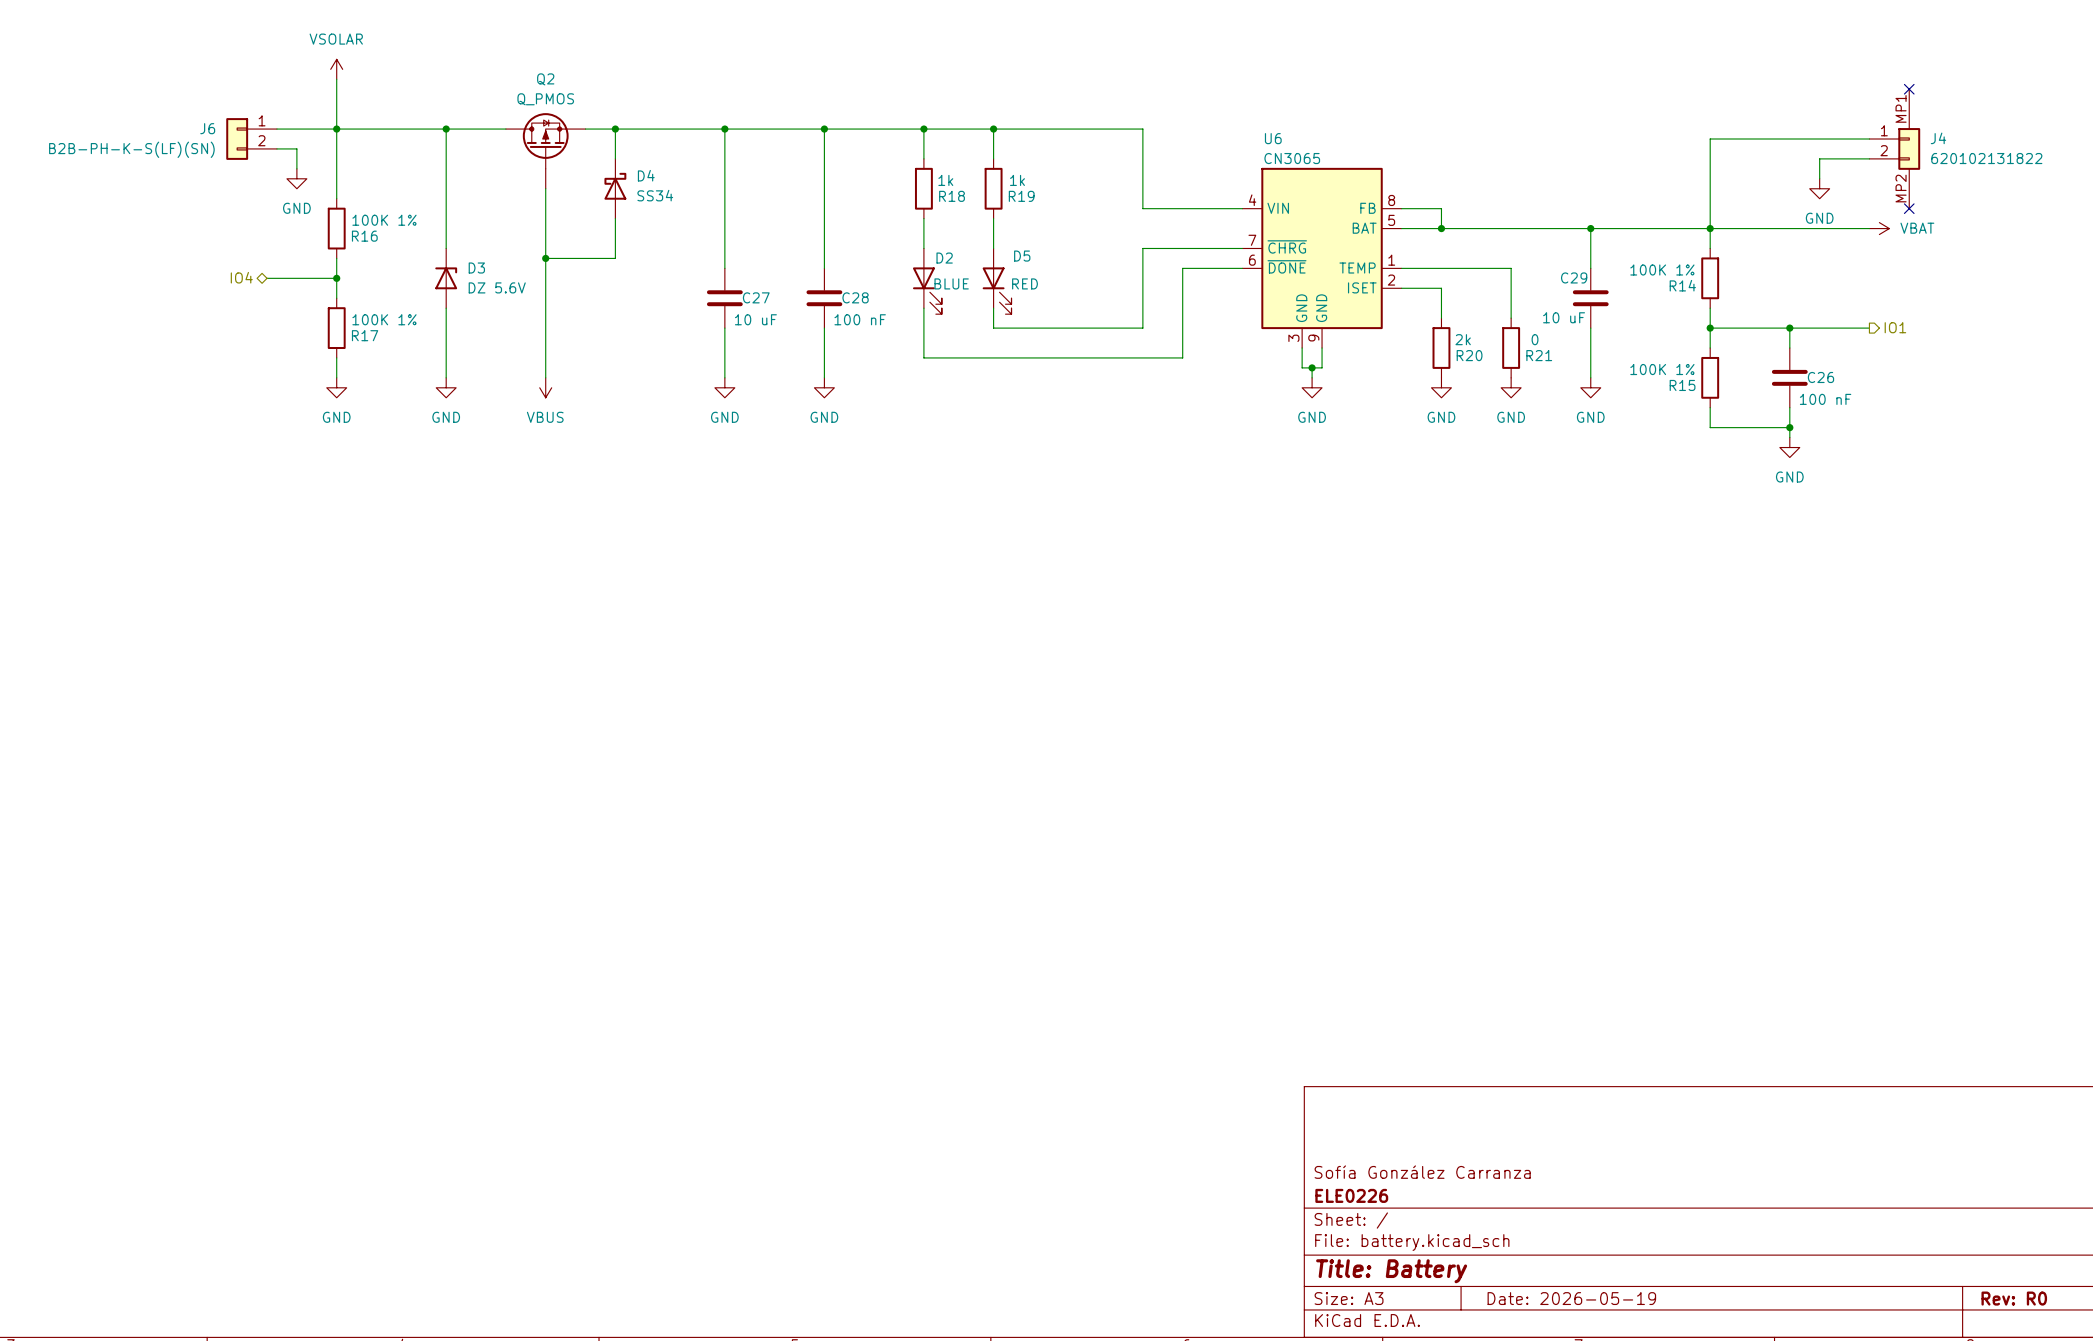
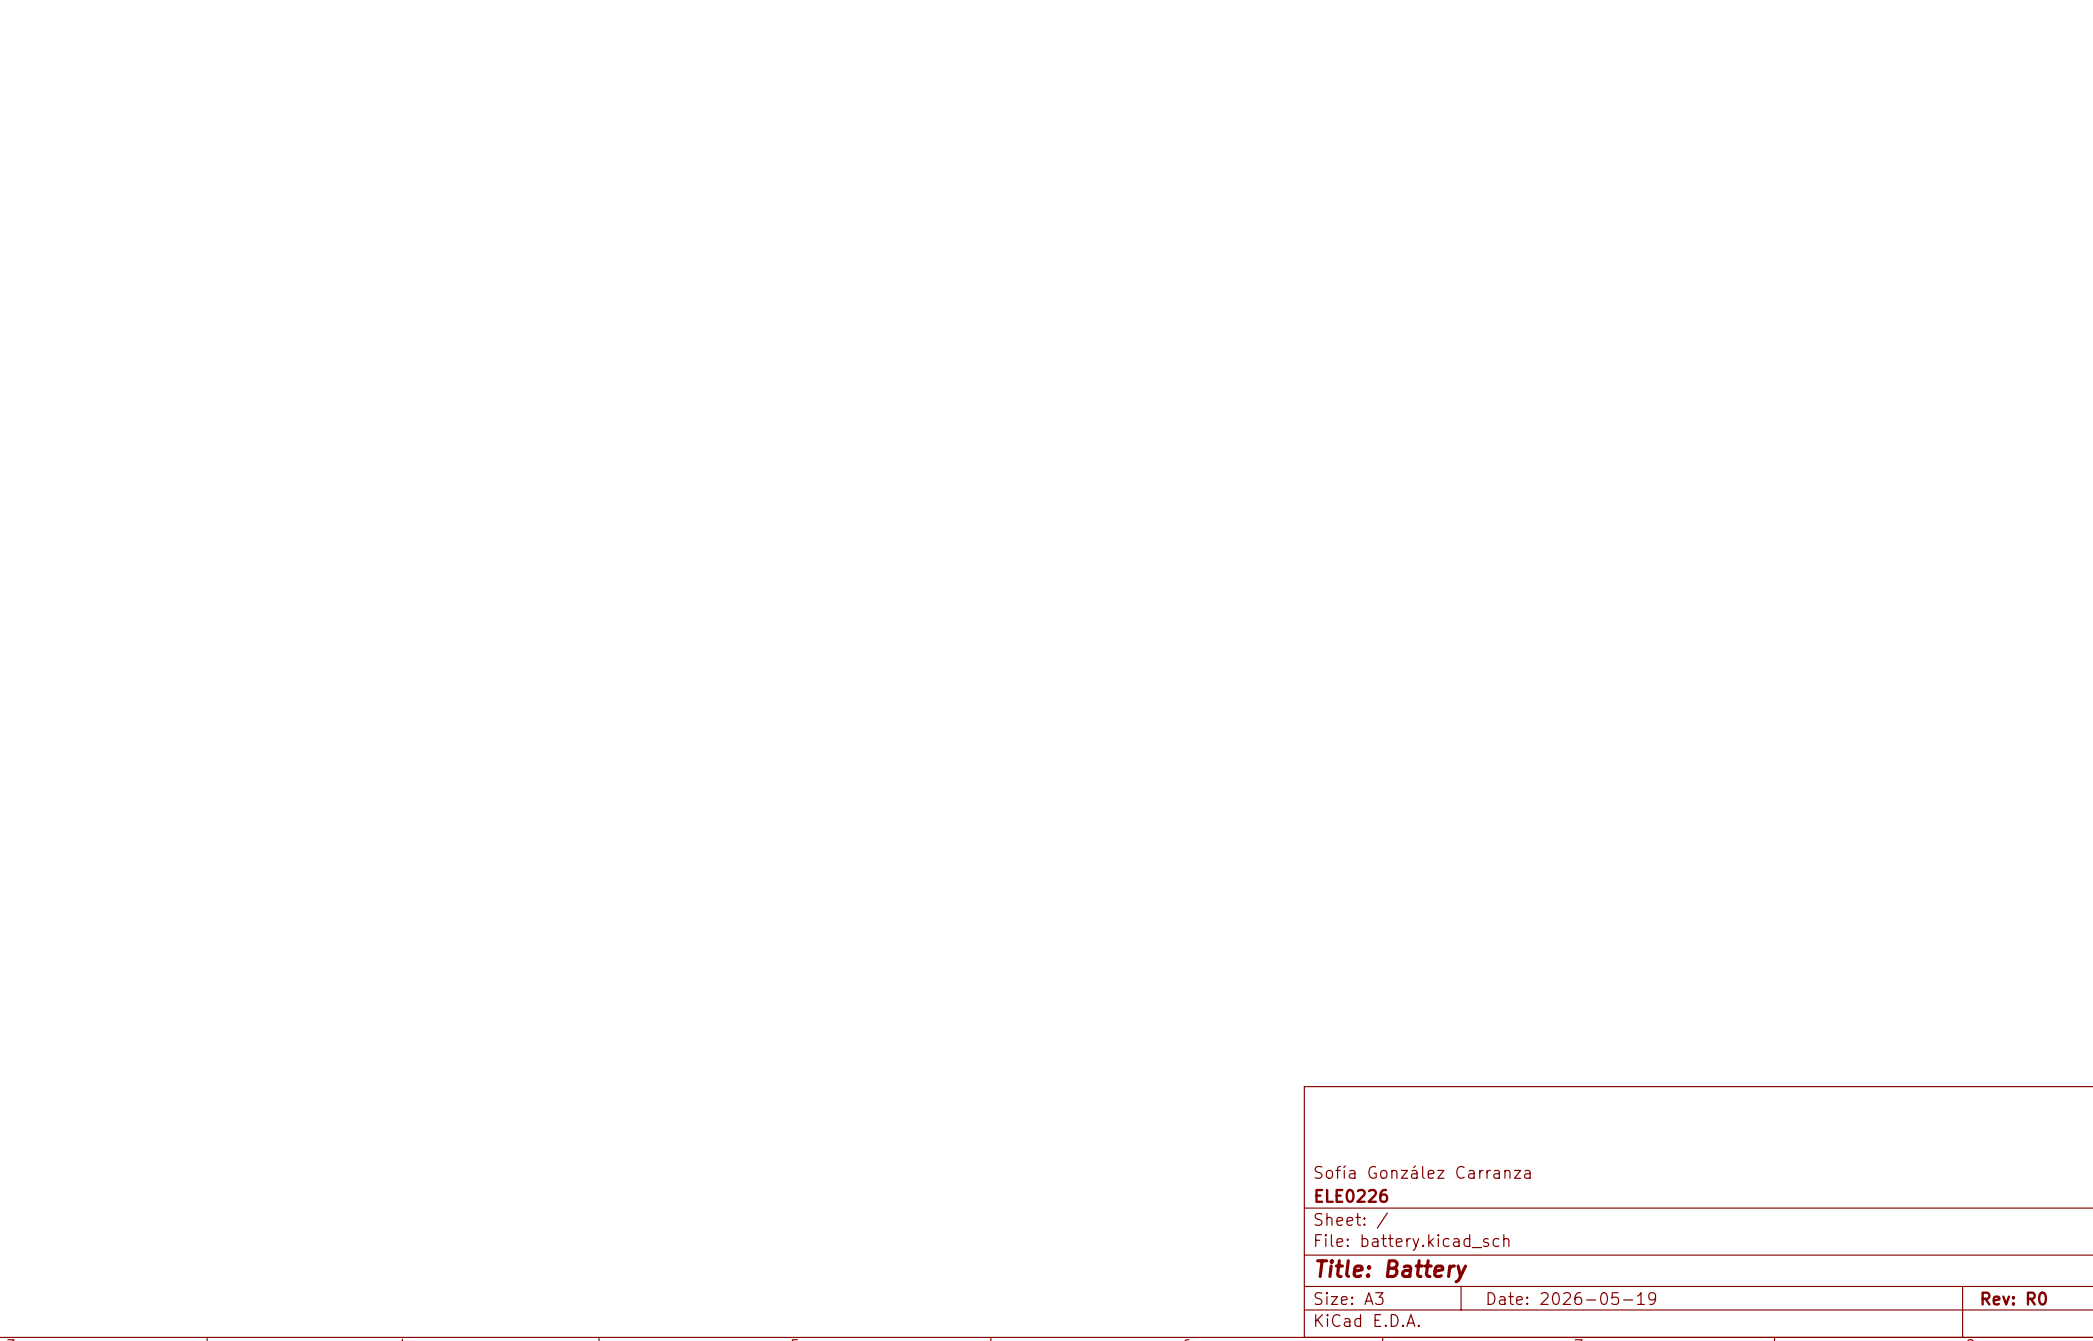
power symbol: VSOLAR (336, 69) -> none
wire: (336, 79) (336, 198) -> none
no-connect mark: (1909, 89) -> none
wire: (276, 129) (505, 129) -> none
junction: (336, 129) -> none
wire: (446, 129) (446, 248) -> none
junction: (446, 129) -> none
wire: (585, 129) (1142, 129) (1142, 208) (1242, 208) -> none
wire: (615, 129) (615, 158) -> none
junction: (615, 129) -> none
wire: (724, 129) (724, 268) -> none
junction: (724, 129) -> none
wire: (824, 129) (824, 268) -> none
junction: (824, 129) -> none
wire: (923, 129) (923, 158) -> none
junction: (923, 129) -> none
wire: (993, 129) (993, 158) -> none
junction: (993, 129) -> none
J6: B2B-PH-K-S(LF)(SN) (251, 139) -> none
wire: (1869, 139) (1710, 139) (1710, 248) -> none
wire: (276, 148) (296, 148) (296, 168) -> none
J4: 620102131822 (1894, 148) -> none
Q2: Q_PMOS (545, 150) -> none
wire: (1869, 158) (1819, 158) (1819, 178) -> none
power symbol: GND (296, 178) -> none
wire: (545, 188) (545, 377) -> none
D4: SS34 (615, 188) -> none
R18: 1k (923, 188) -> none
R19: 1k (993, 188) -> none
power symbol: GND (1819, 188) -> none
wire: (1401, 208) (1441, 208) (1441, 228) -> none
no-connect mark: (1909, 208) -> none
wire: (615, 218) (615, 258) (545, 258) -> none
wire: (923, 218) (923, 248) -> none
wire: (993, 218) (993, 248) -> none
R16: 100K 1% (336, 228) -> none
wire: (1401, 228) (1869, 228) -> none
junction: (1441, 228) -> none
wire: (1590, 228) (1590, 268) -> none
junction: (1590, 228) -> none
junction: (1710, 228) -> none
power symbol: VBAT (1879, 228) -> none
wire: (1242, 248) (1142, 248) (1142, 328) (993, 328) (993, 308) -> none
U6: CN3065 (1322, 257) -> none
wire: (336, 258) (336, 298) -> none
junction: (545, 258) -> none
wire: (1242, 268) (1182, 268) (1182, 357) (923, 357) (923, 308) -> none
wire: (1401, 268) (1511, 268) (1511, 318) -> none
hierarchical label: IO4 (241, 277) -> none
wire: (267, 278) (336, 278) -> none
junction: (336, 278) -> none
D3: DZ 5.6V (446, 278) -> none
R14: 100K 1% (1710, 278) -> none
D2: BLUE (927, 281) -> none
D5: RED (997, 281) -> none
wire: (1401, 288) (1441, 288) (1441, 318) -> none
C27: 10 uF (724, 298) -> none
C28: 100 nF (824, 298) -> none
C29: 10 uF (1590, 298) -> none
wire: (446, 308) (446, 377) -> none
wire: (1710, 308) (1710, 348) -> none
hierarchical label: IO1 (1895, 327) -> none
R17: 100K 1% (336, 328) -> none
wire: (724, 328) (724, 377) -> none
wire: (824, 328) (824, 377) -> none
wire: (1590, 328) (1590, 377) -> none
wire: (1710, 328) (1869, 328) -> none
junction: (1710, 328) -> none
wire: (1789, 328) (1789, 348) -> none
junction: (1789, 328) -> none
wire: (1302, 348) (1302, 367) (1322, 367) (1322, 348) -> none
R20: 2k (1441, 348) -> none
R21: 0 (1511, 348) -> none
wire: (336, 357) (336, 377) -> none
wire: (1312, 367) (1312, 377) -> none
junction: (1312, 367) -> none
R15: 100K 1% (1710, 377) -> none
C26: 100 nF (1789, 377) -> none
power symbol: GND (336, 387) -> none
power symbol: GND (446, 387) -> none
power symbol: VBUS (545, 387) -> none
power symbol: GND (724, 387) -> none
power symbol: GND (824, 387) -> none
power symbol: GND (1312, 387) -> none
power symbol: GND (1441, 387) -> none
power symbol: GND (1511, 387) -> none
power symbol: GND (1590, 387) -> none
wire: (1710, 407) (1710, 427) (1789, 427) -> none
wire: (1789, 407) (1789, 437) -> none
junction: (1789, 427) -> none
power symbol: GND (1789, 447) -> none

